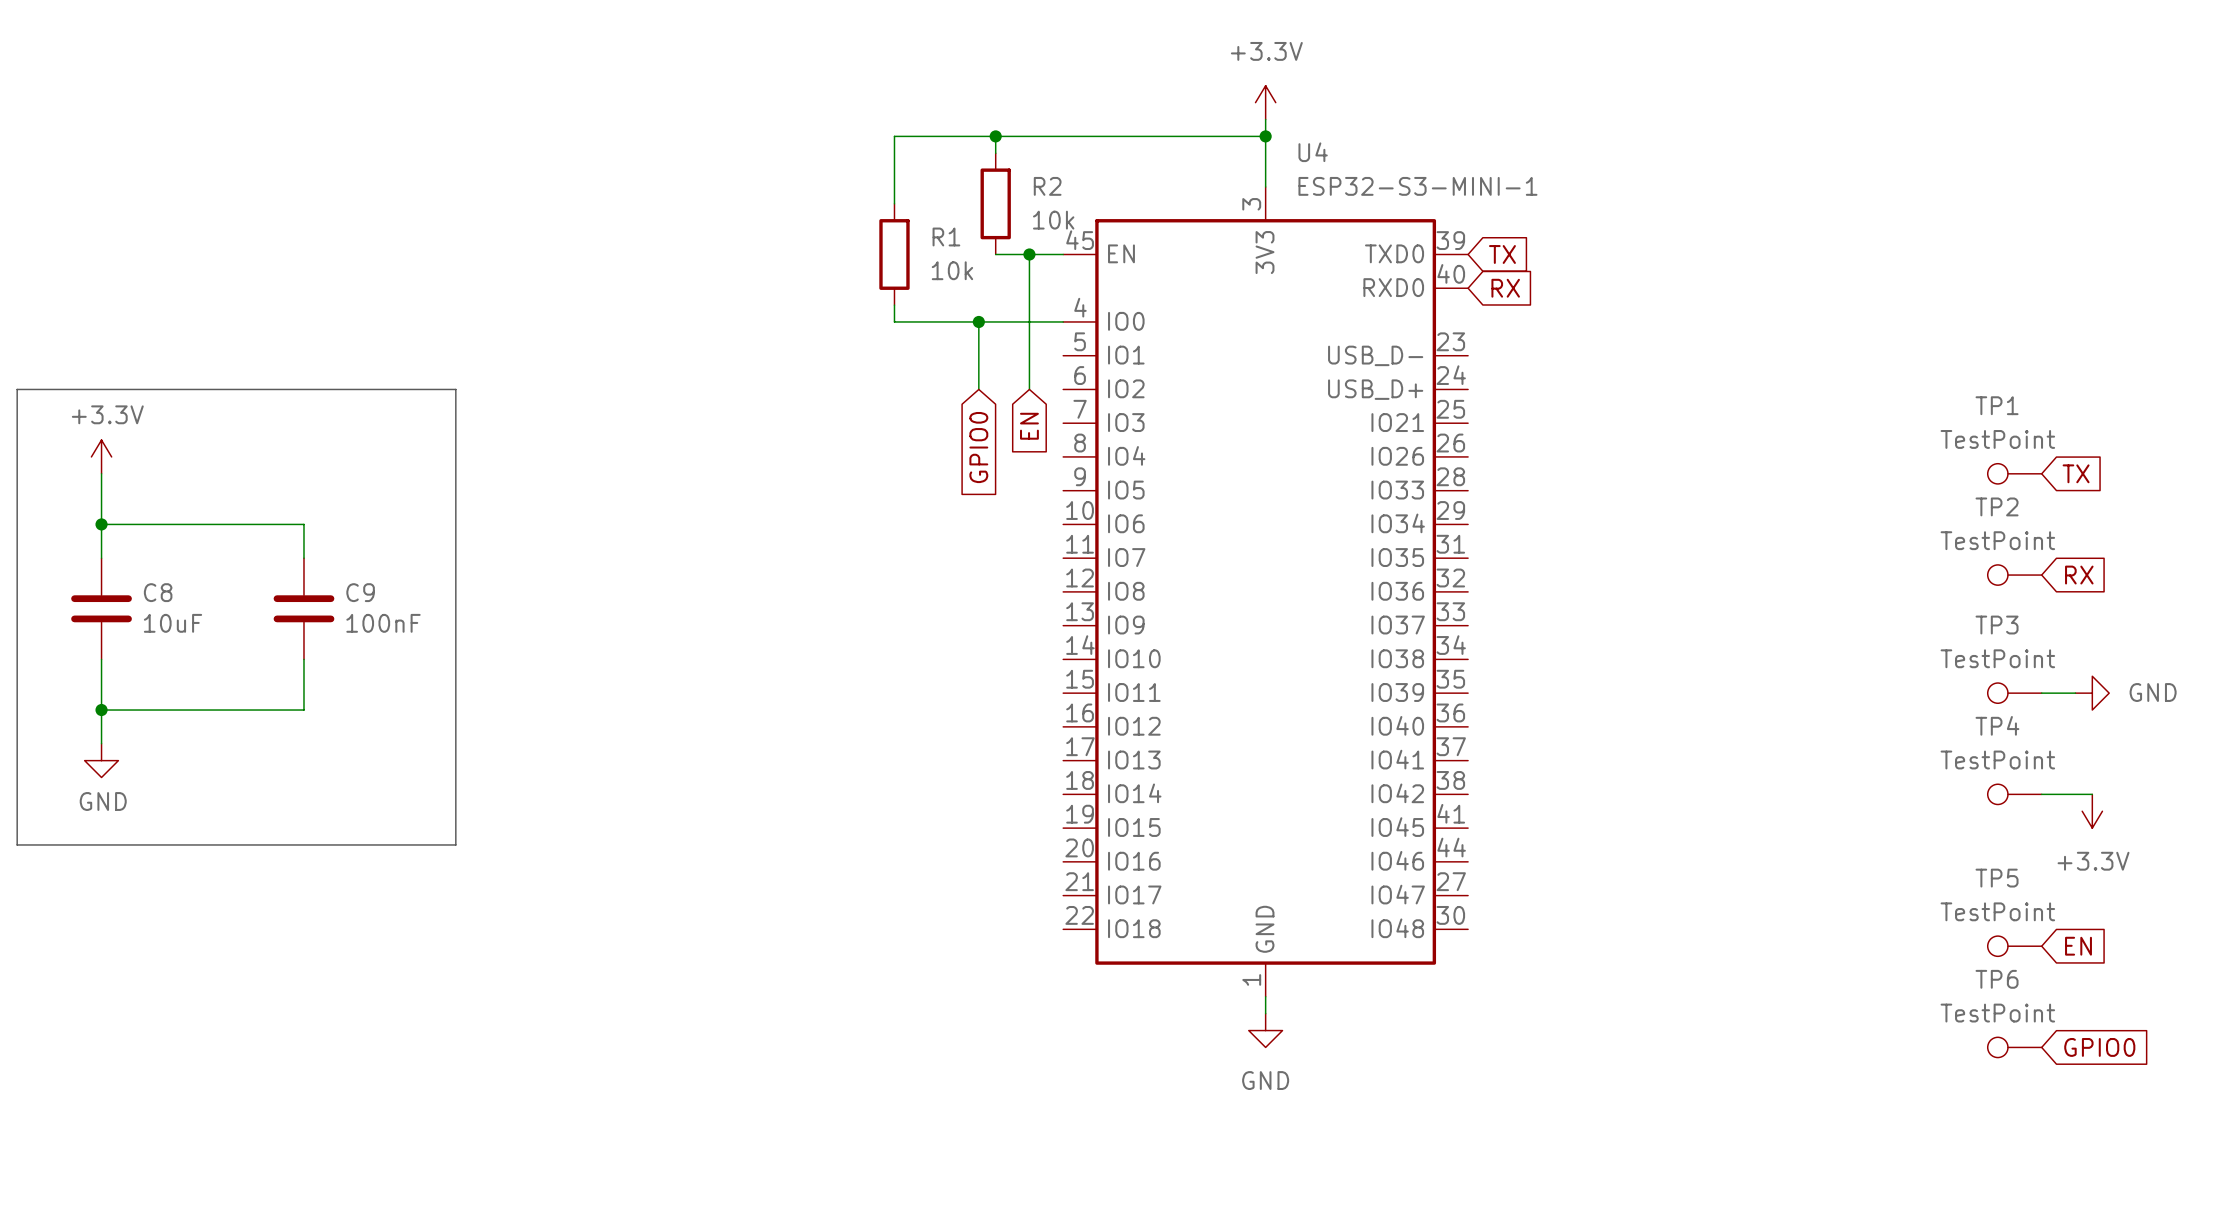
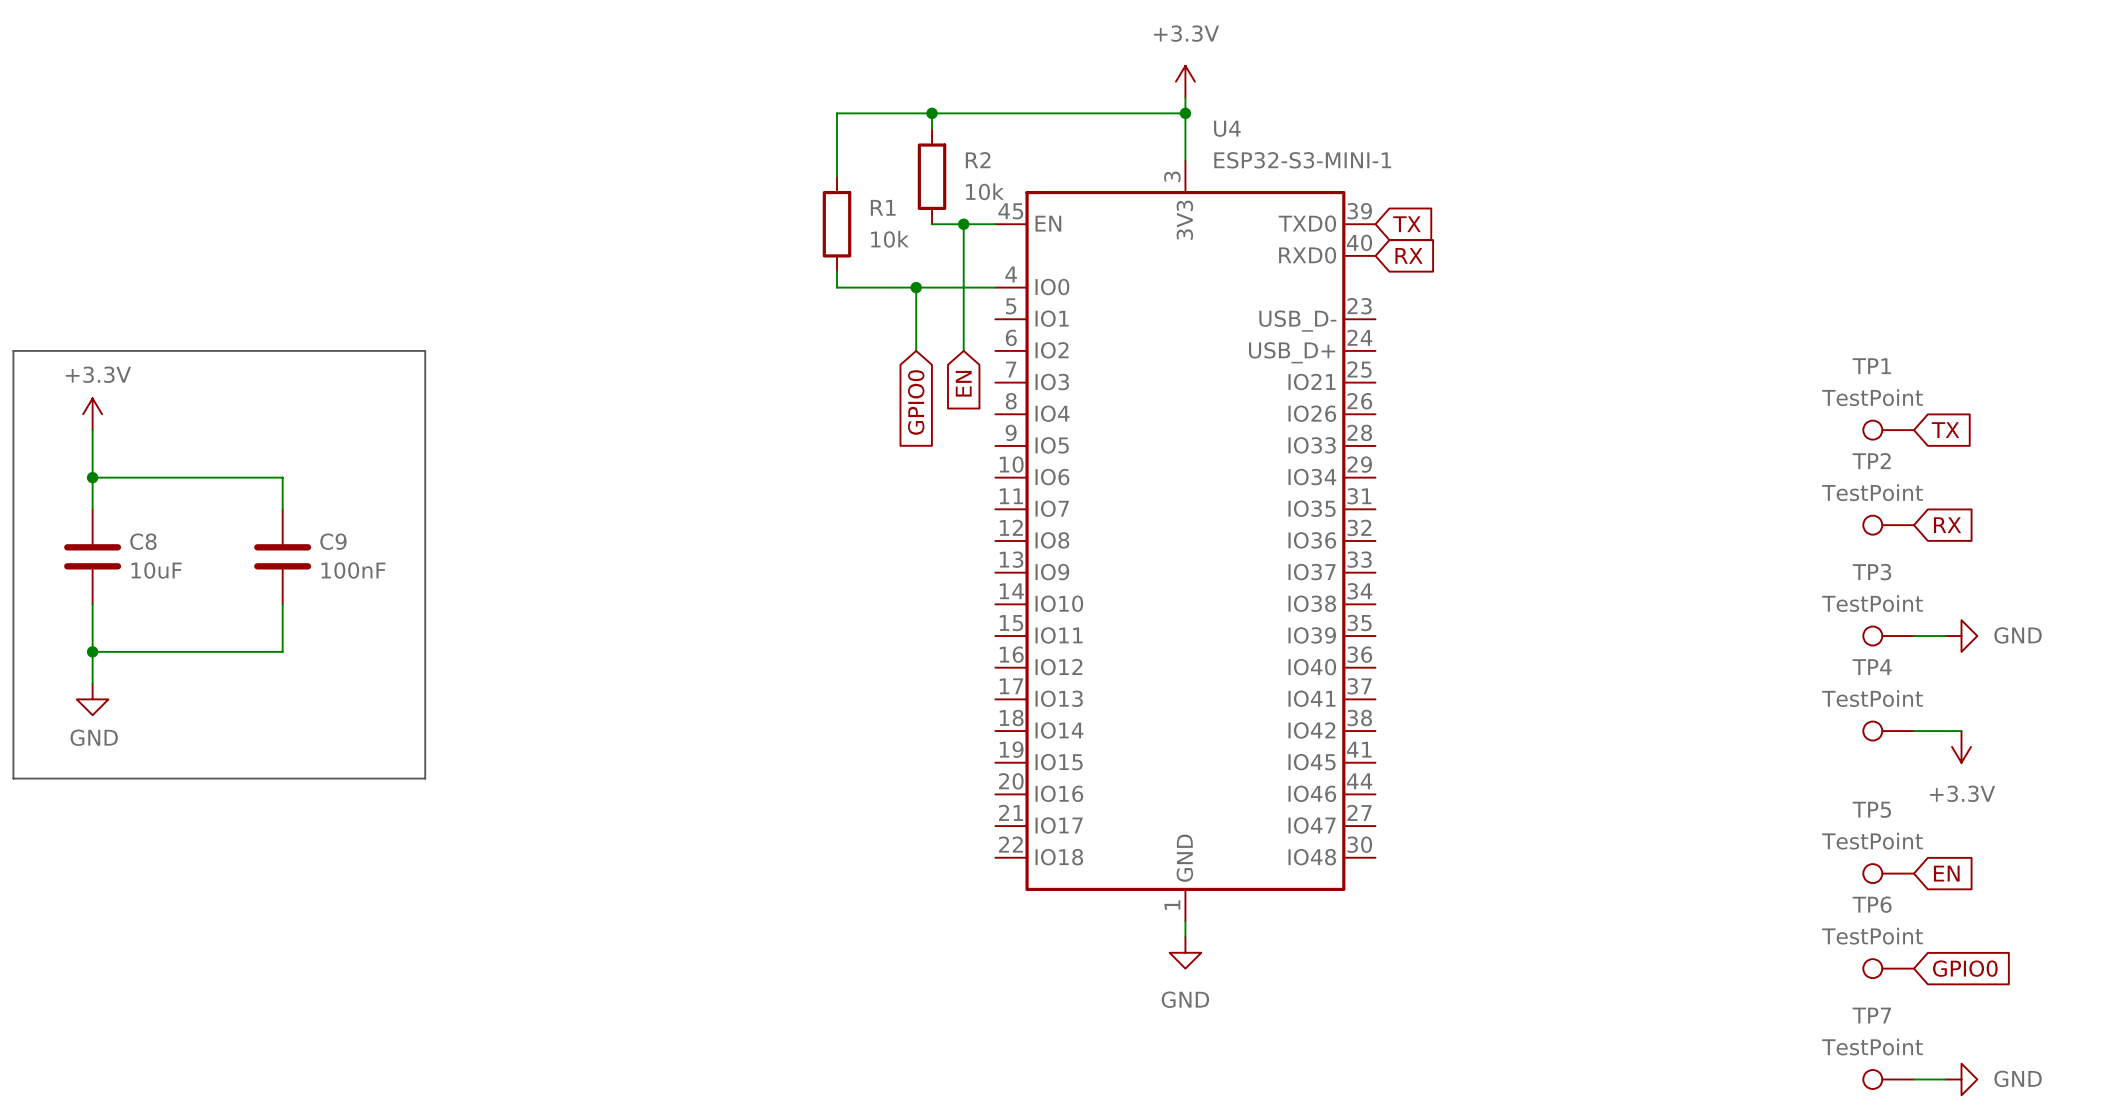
TP7: none -> TestPoint (1888, 1079)
wire: none -> (1913, 1079) (1945, 1079)
power symbol: none -> GND (1961, 1079)

